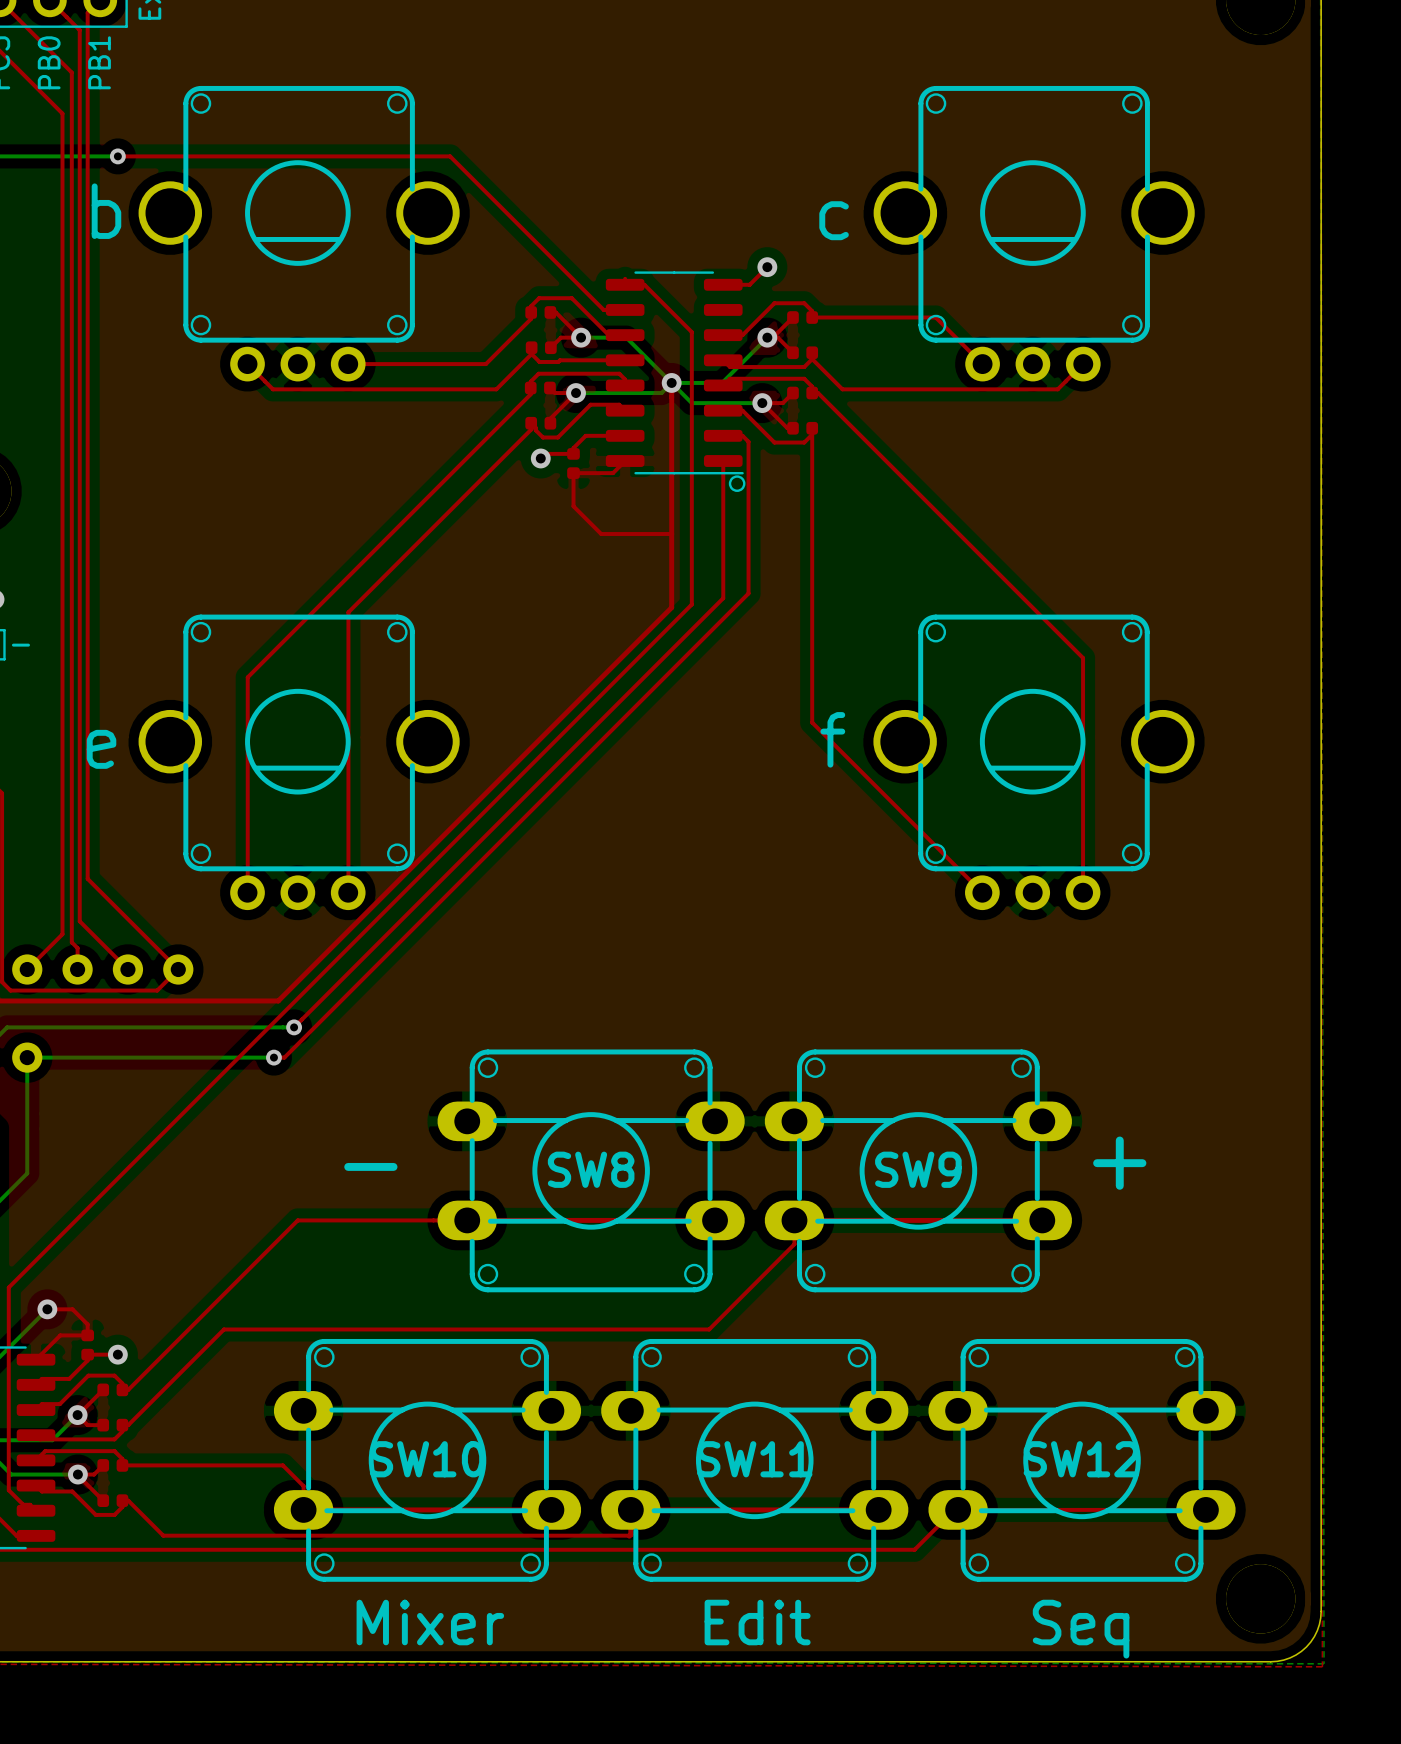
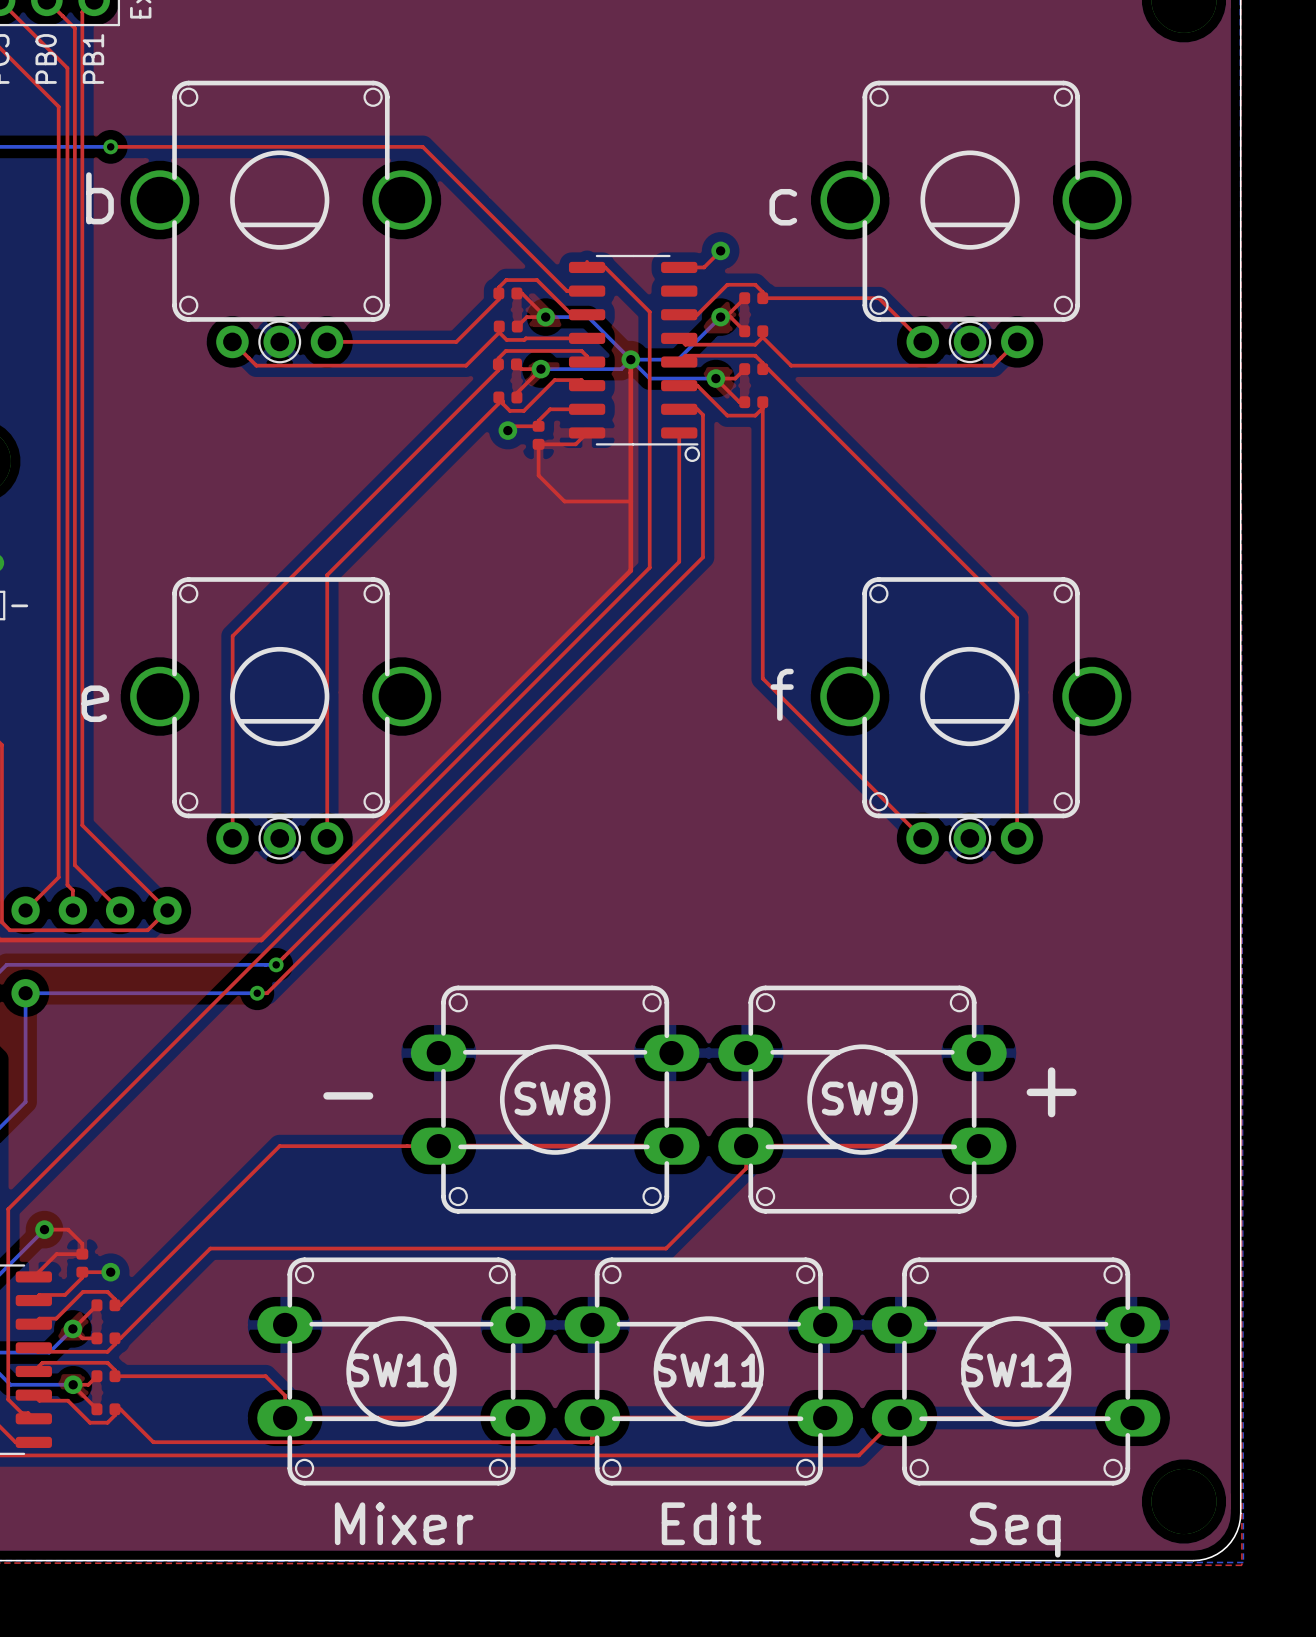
drawing: none -> [258, 320, 302, 364]
drawing: none -> [948, 320, 992, 364]
drawing: none -> [258, 817, 301, 860]
drawing: none -> [948, 817, 992, 860]

